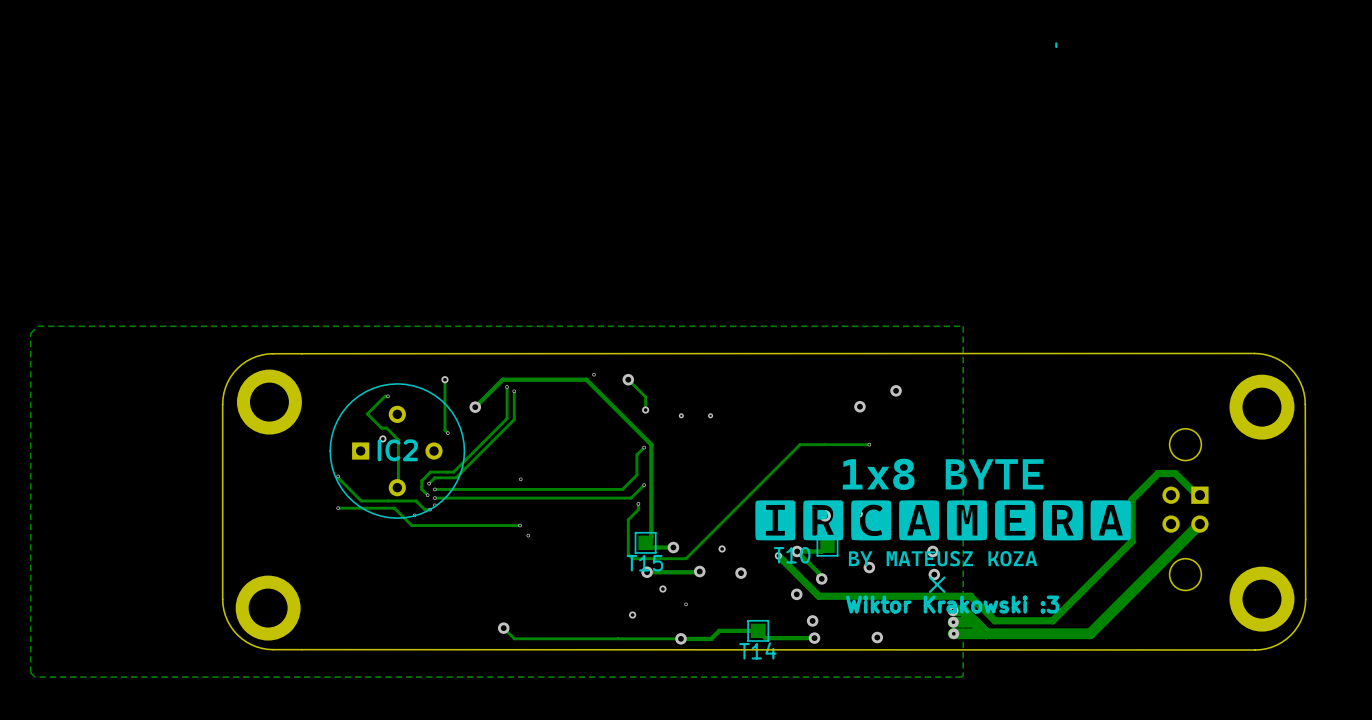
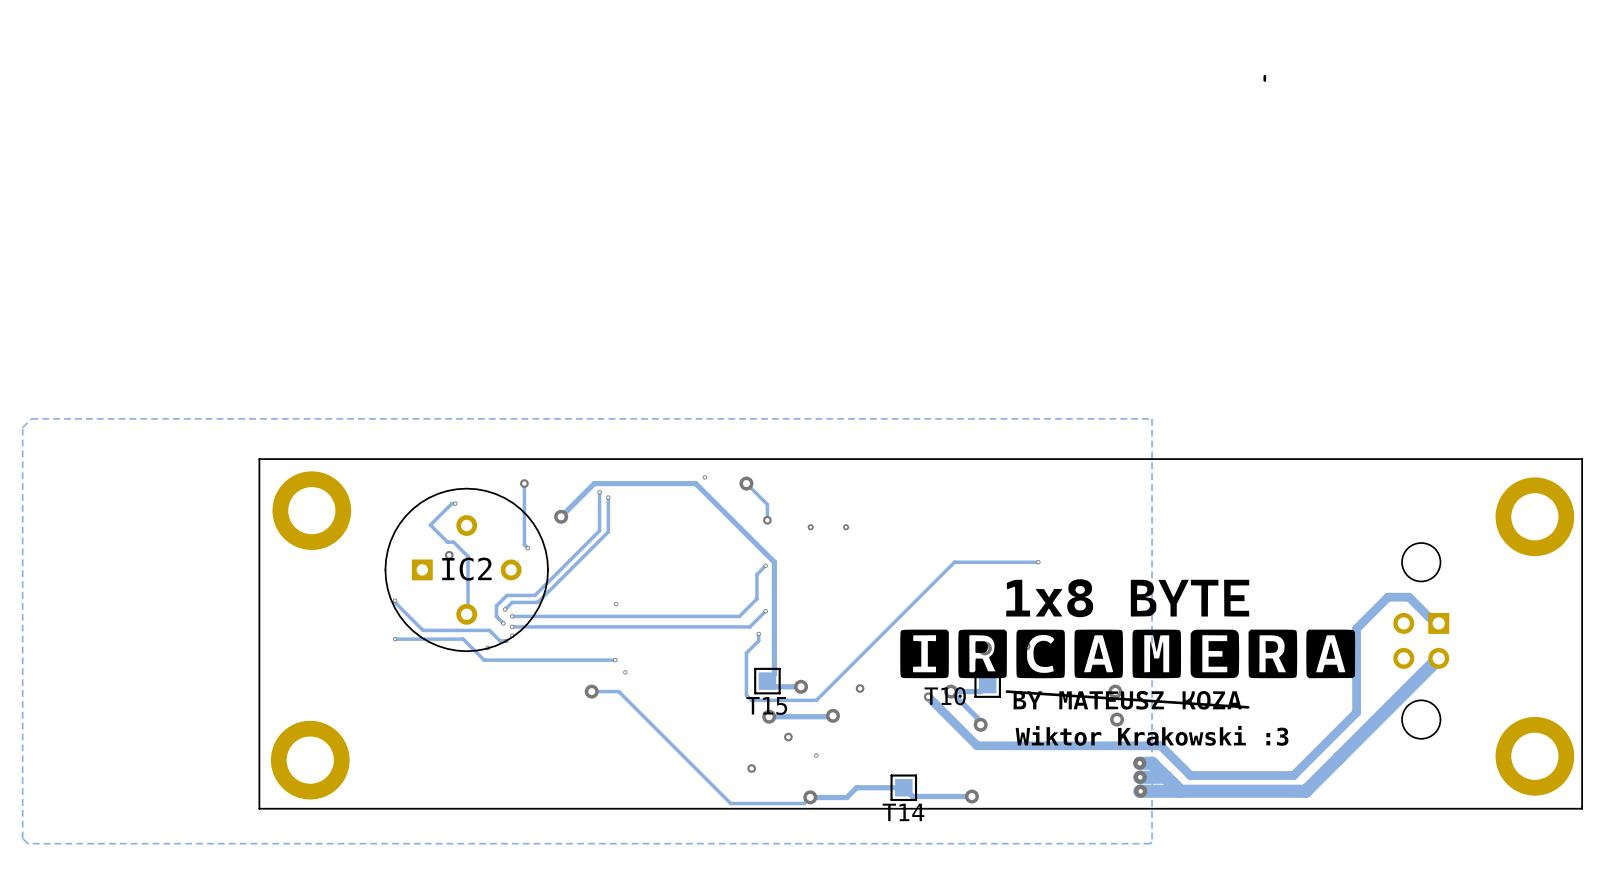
board edge: (1254, 353) (261, 355) (246, 361) (237, 368) (227, 382) (222, 398) (223, 610) (230, 626) (241, 638) (256, 646) (273, 649) (1266, 648) (1282, 642) (1294, 630) (1300, 621) (1305, 605) (1305, 404) (1302, 387) (1290, 368) (1276, 358) (1254, 353) -> (1582, 459) (1582, 808) (259, 808) (259, 459) (1582, 459)
via: (896, 390) -> none
via: (859, 406) -> none
part position: (1261, 407) -> (1534, 516)
track: (1132, 541) (1052, 620) -> (1356, 679) (1356, 712) (1293, 775) (1260, 775)
line: none -> (1006, 691) (1248, 707)
via: (869, 567) -> none
via: (741, 573) -> none
line: (929, 577) (944, 591) -> none
line: (944, 577) (929, 591) -> none
via: (796, 594) -> none
part position: (1261, 599) -> (1534, 756)
text position: Wiktor Krakowski :3 (952, 604) -> Wiktor Krakowski :3 (1152, 735)
via: (812, 620) -> none
track: (503, 628) (514, 638) (680, 638) -> (591, 691) (618, 691) (730, 803) (804, 803) (810, 797)
via position: (503, 628) -> (591, 691)
via: (877, 637) -> none

